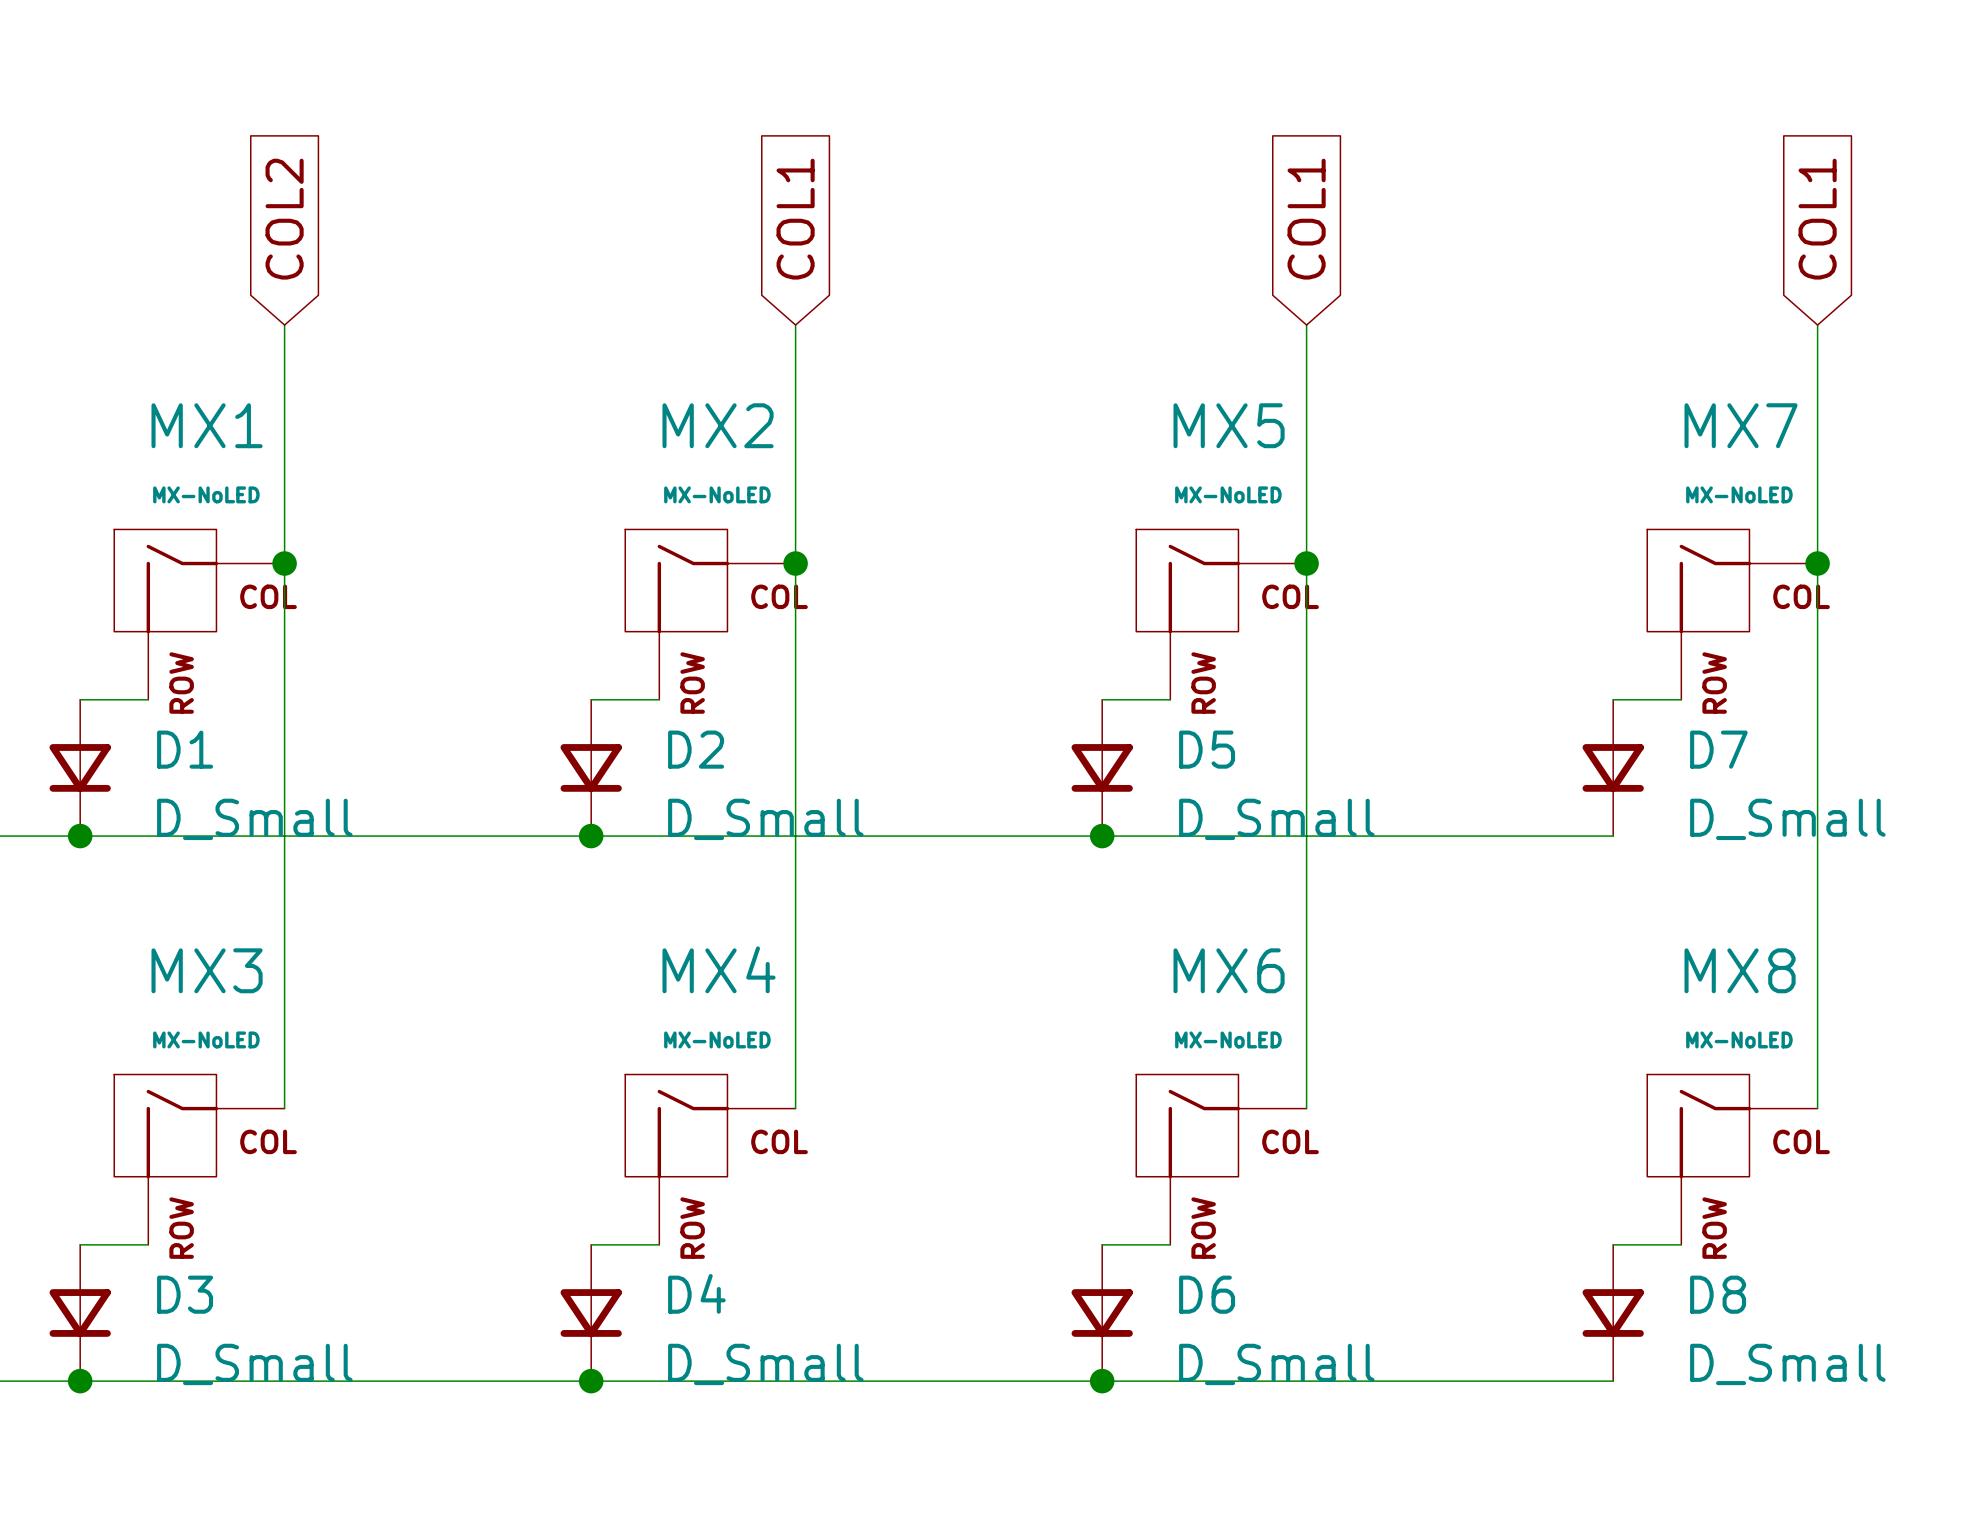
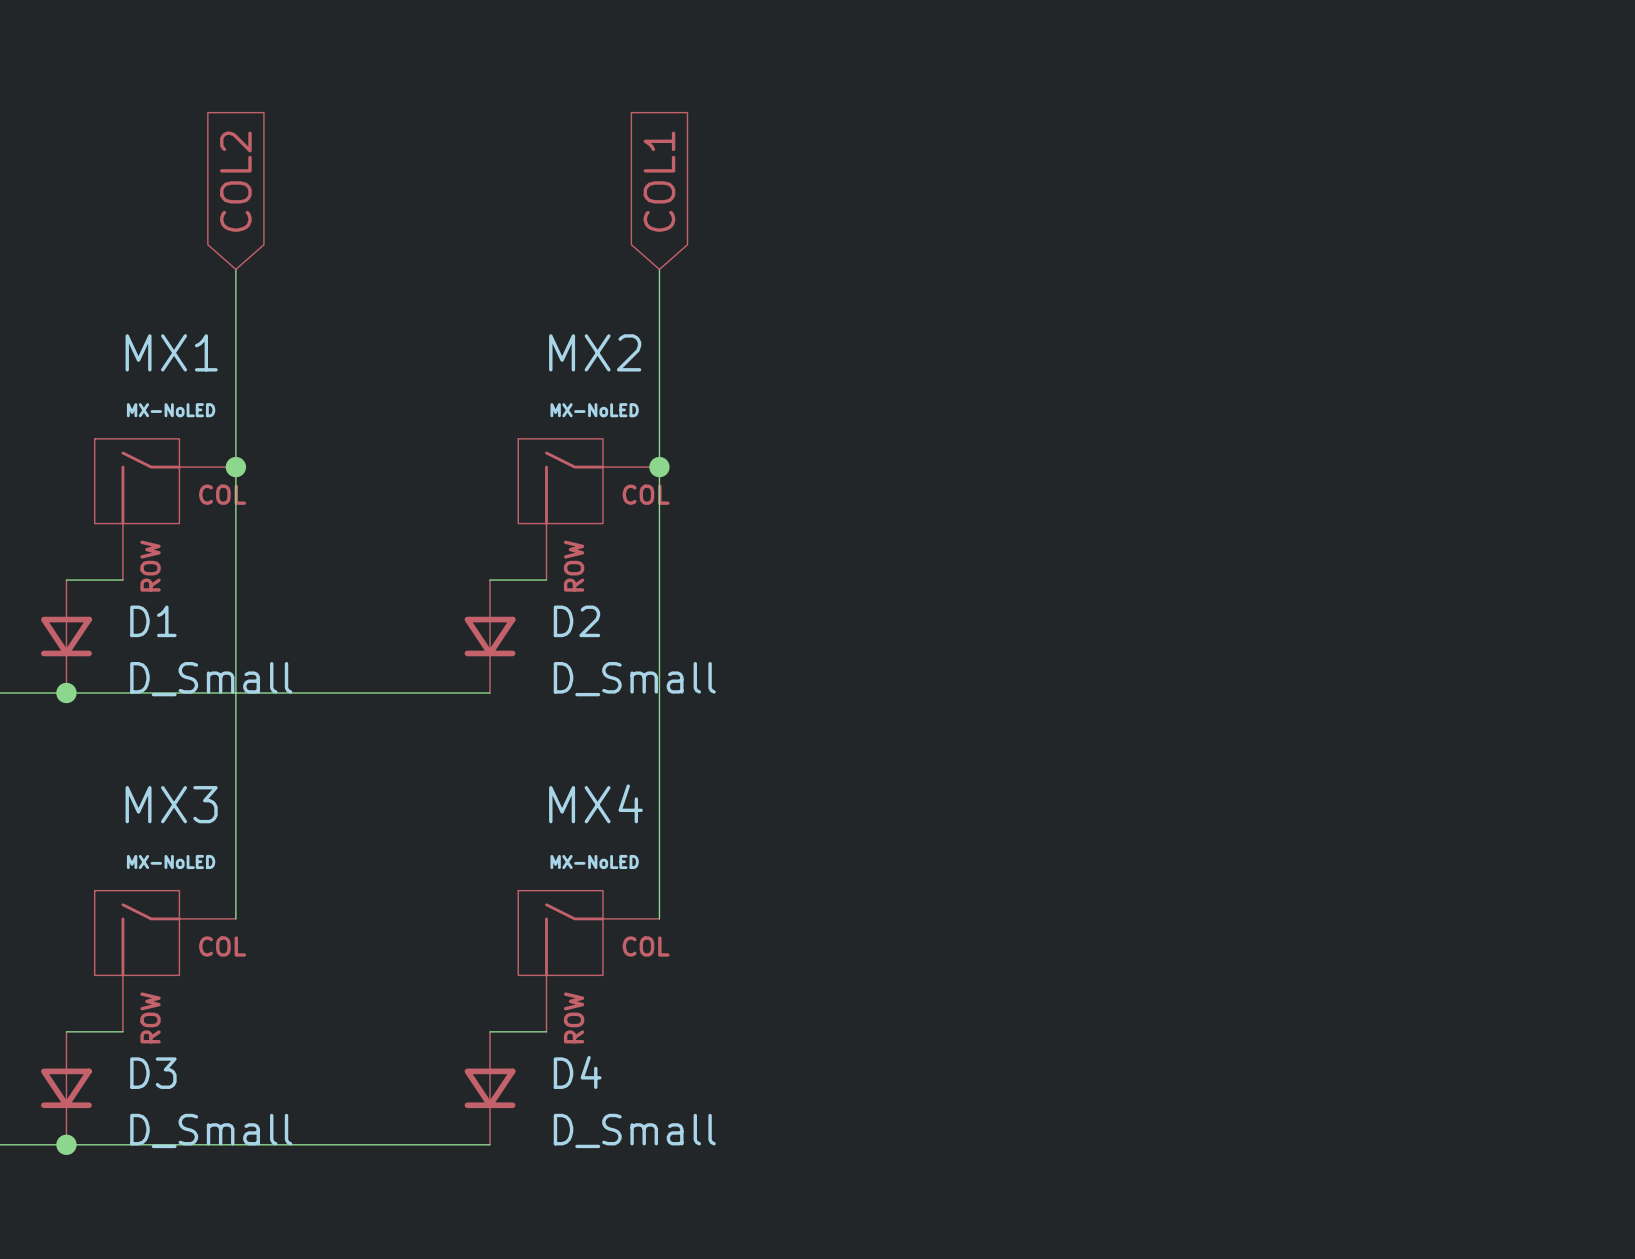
global label: COL1 (1306, 219) -> none
global label: COL1 (1817, 219) -> none
wire: (1306, 325) (1306, 1108) -> none
wire: (1817, 325) (1817, 1108) -> none
junction: (1306, 563) -> none
junction: (1817, 563) -> none
MX5: MX-NoLED (1221, 614) -> none
MX7: MX-NoLED (1732, 614) -> none
wire: (1102, 699) (1170, 699) -> none
wire: (1613, 699) (1681, 699) -> none
D5: D_Small (1102, 767) -> none
D7: D_Small (1613, 767) -> none
wire: (591, 836) (1613, 836) -> none
junction: (591, 836) -> none
junction: (1102, 836) -> none
MX6: MX-NoLED (1221, 1159) -> none
MX8: MX-NoLED (1732, 1159) -> none
wire: (1102, 1244) (1170, 1244) -> none
wire: (1613, 1244) (1681, 1244) -> none
D6: D_Small (1102, 1312) -> none
D8: D_Small (1613, 1312) -> none
wire: (591, 1381) (1613, 1381) -> none
junction: (591, 1381) -> none
junction: (1102, 1381) -> none

